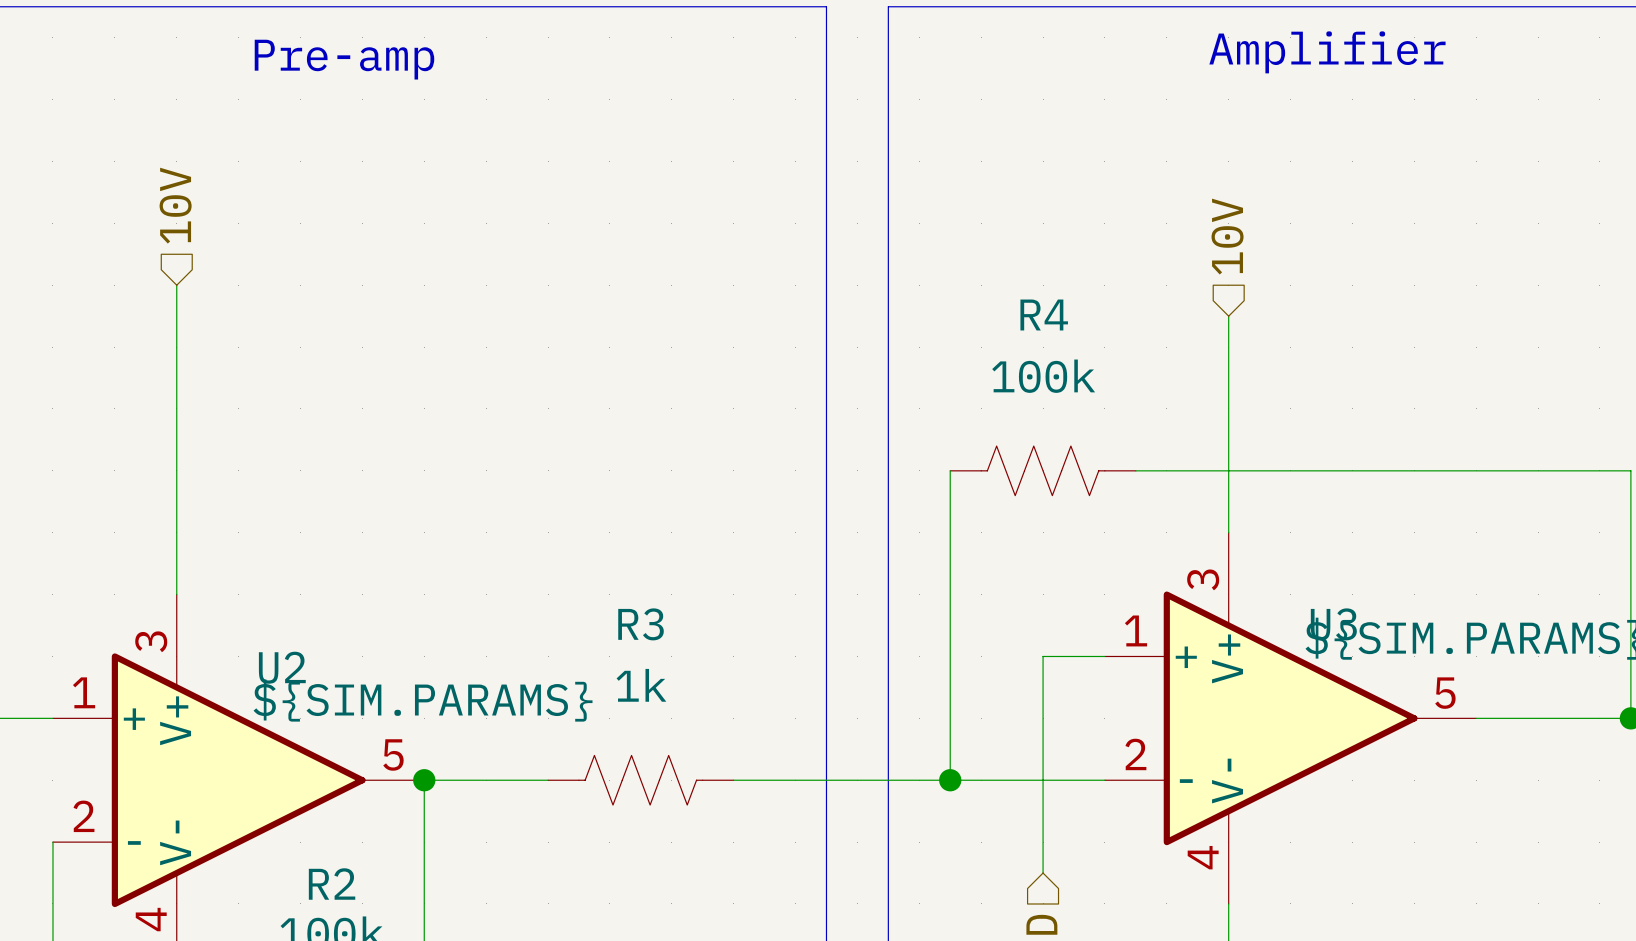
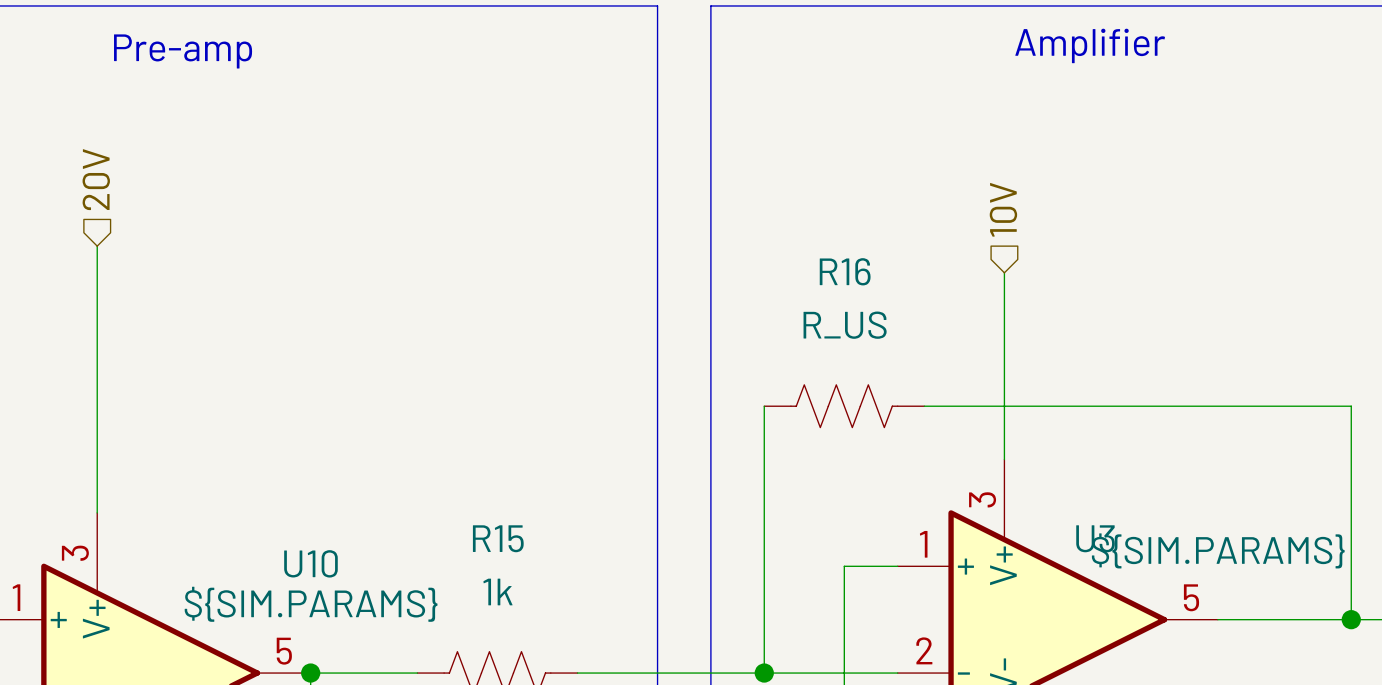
text position: Pre-amp (344, 59) -> Pre-amp (183, 51)
hierarchical label: 10V (175, 205) -> 20V (96, 179)
R4 name: R4 (1044, 314) -> R16 (845, 271)
R4 value: 100k (1043, 376) -> R_US (845, 325)
R3 name: R3 (641, 624) -> R15 (498, 538)
U2 name: U2 (282, 667) -> U10 (310, 563)

